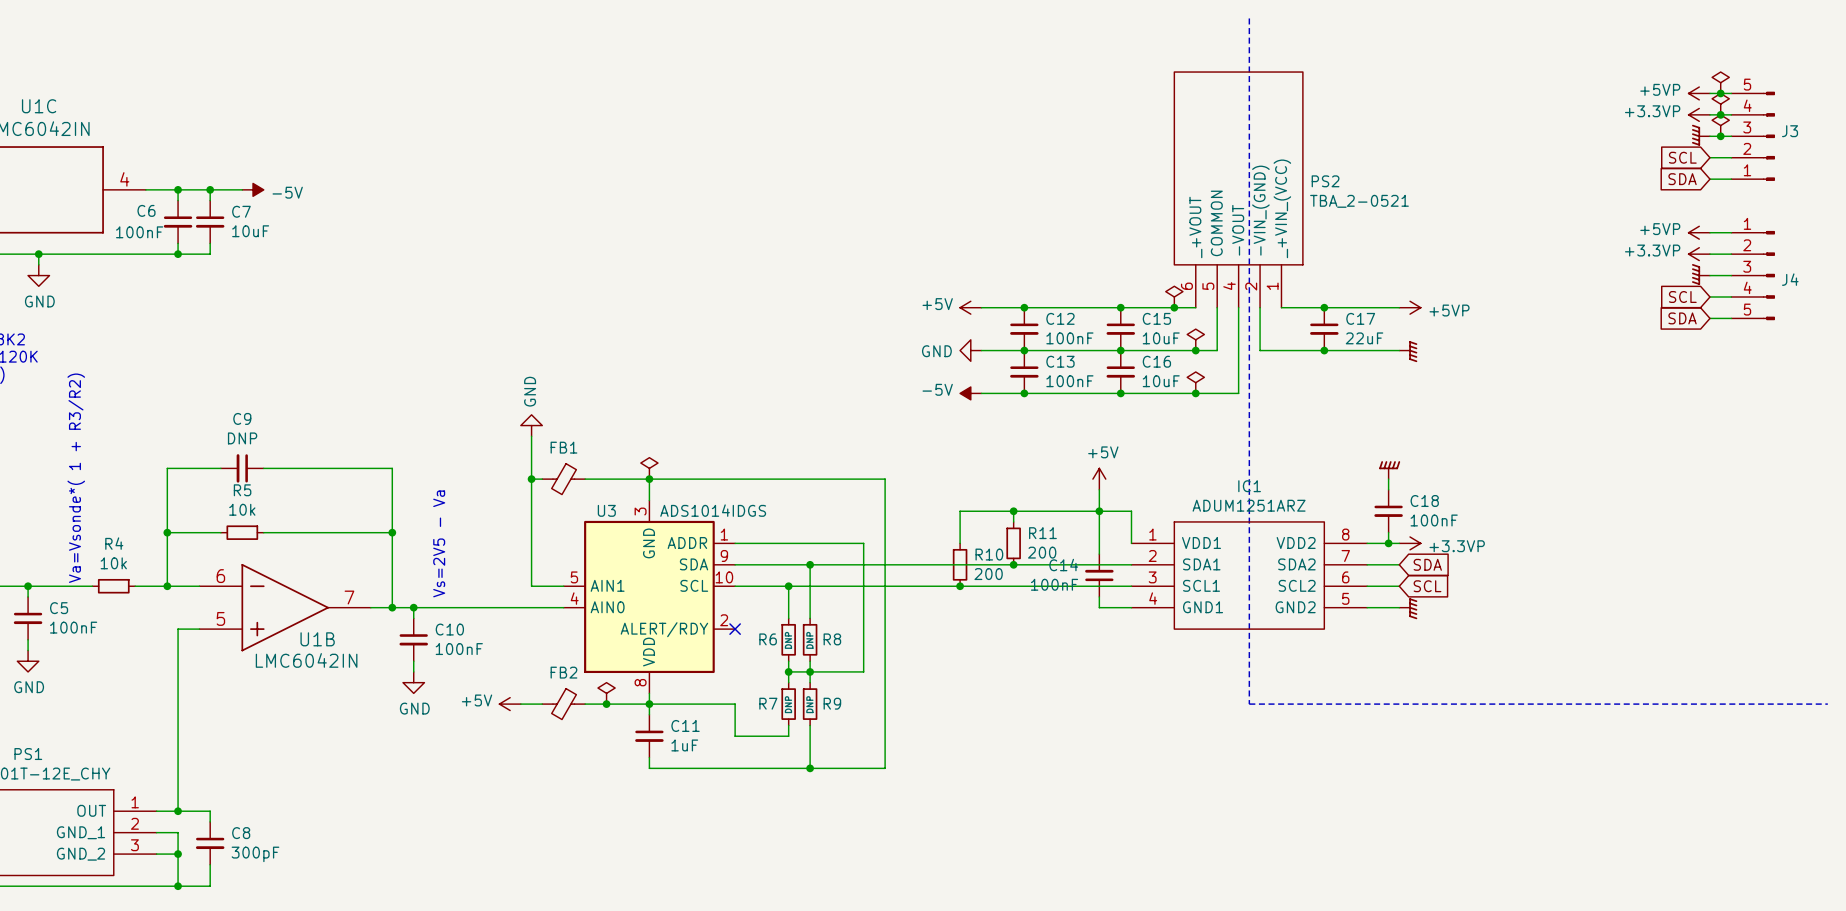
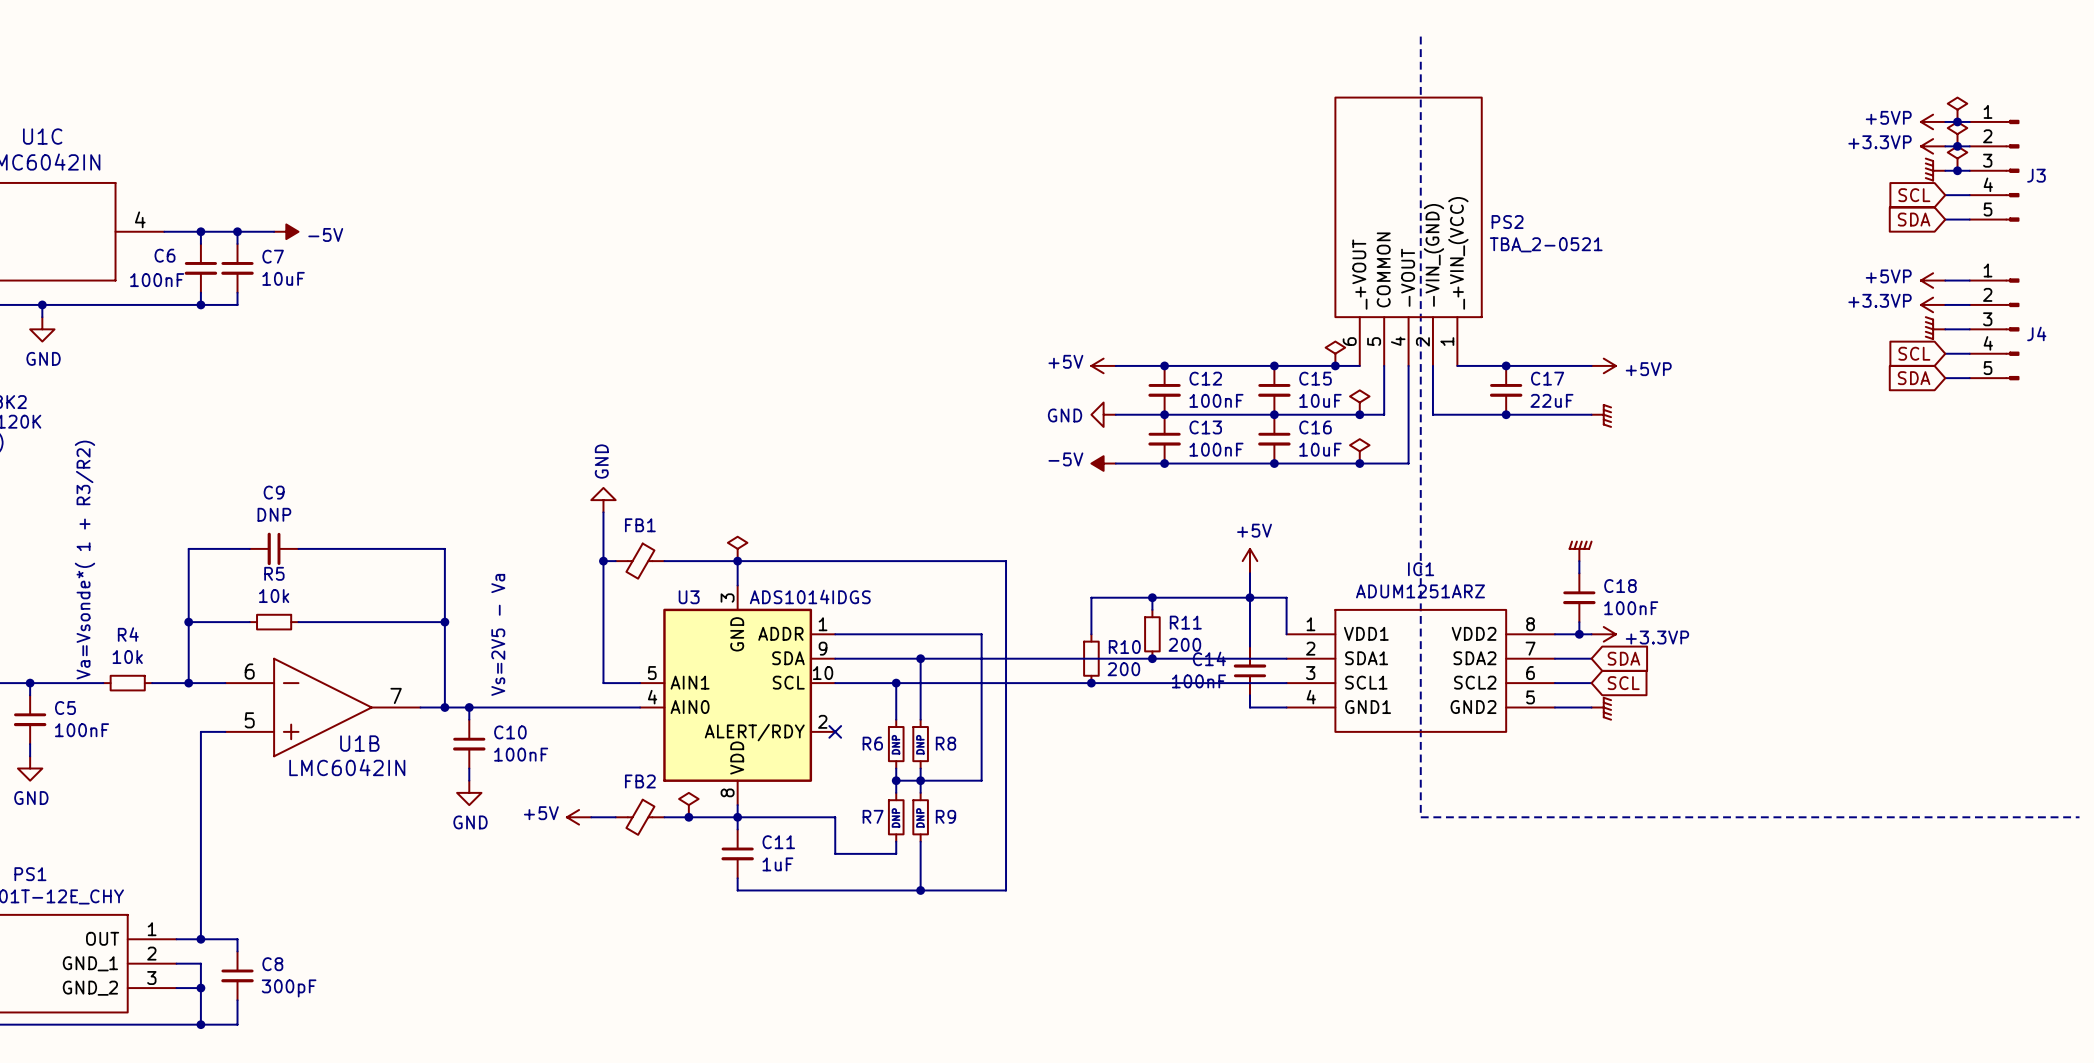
J3 flip: as is (1768, 136) -> up-down (2012, 170)

